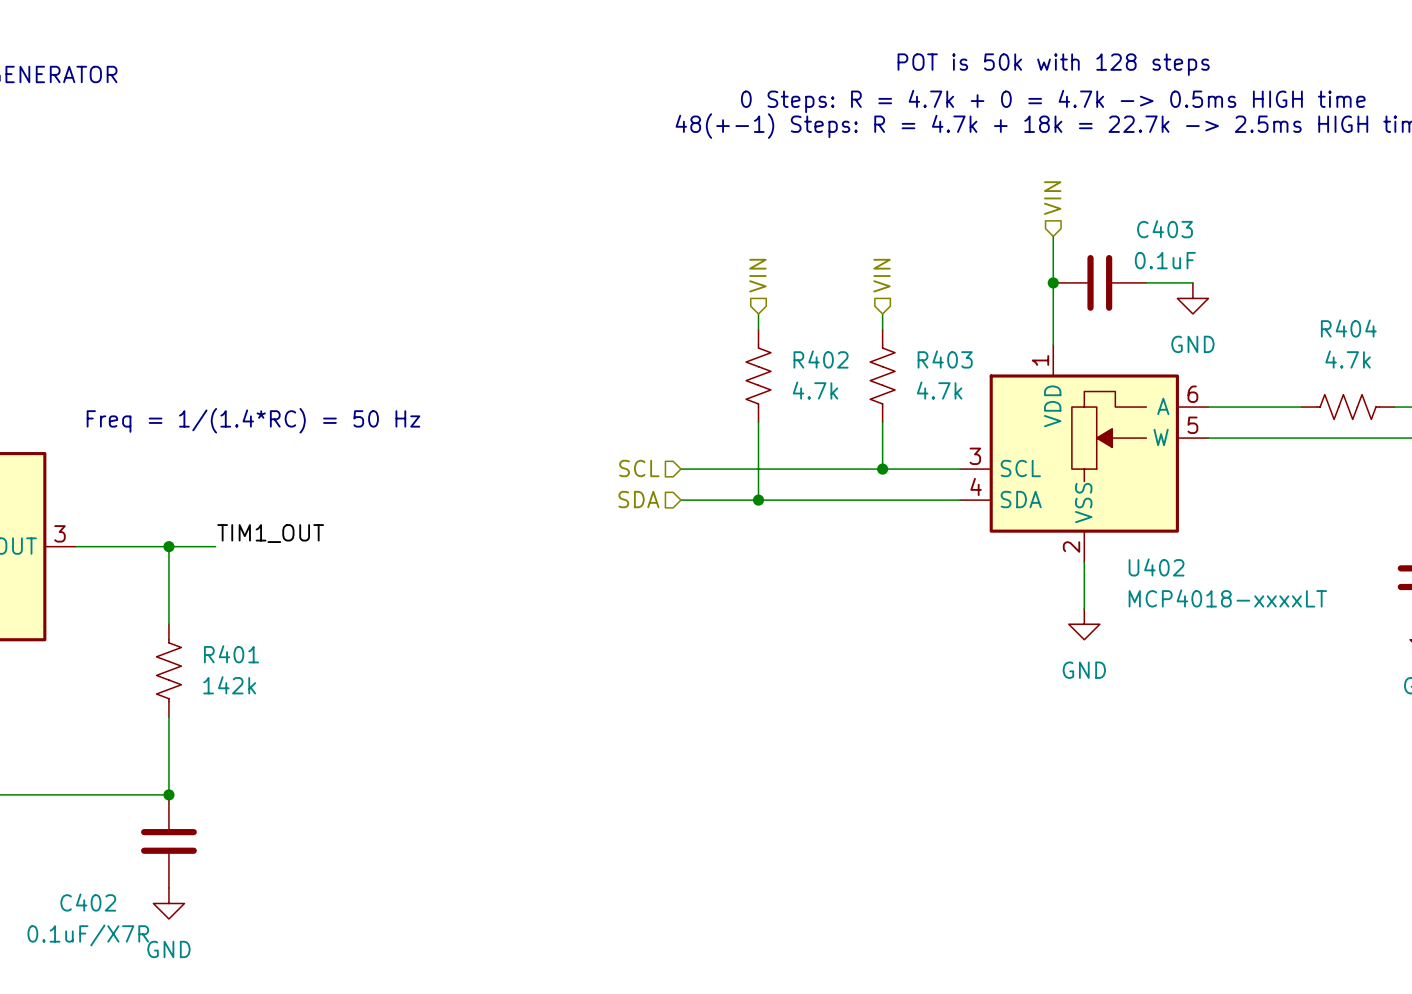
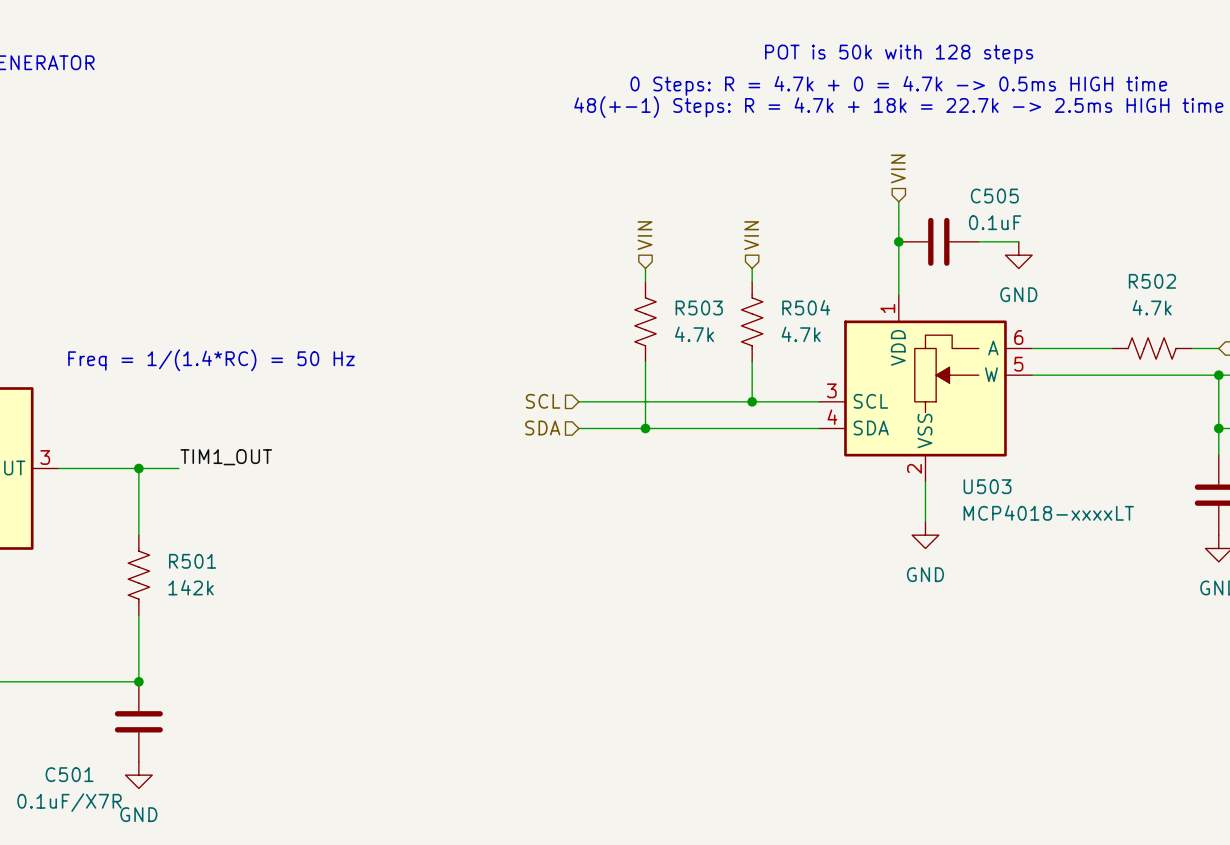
C403 name: C403 (1164, 229) -> C505 (994, 196)
R404 name: R404 (1348, 328) -> R502 (1152, 281)
R402 name: R402 (821, 359) -> R503 (699, 308)
R403 name: R403 (945, 359) -> R504 (806, 307)
U402 name: U402 (1156, 567) -> U503 (987, 486)
R401 name: R401 (231, 654) -> R501 (192, 561)
C402 name: C402 (88, 902) -> C501 (69, 774)

